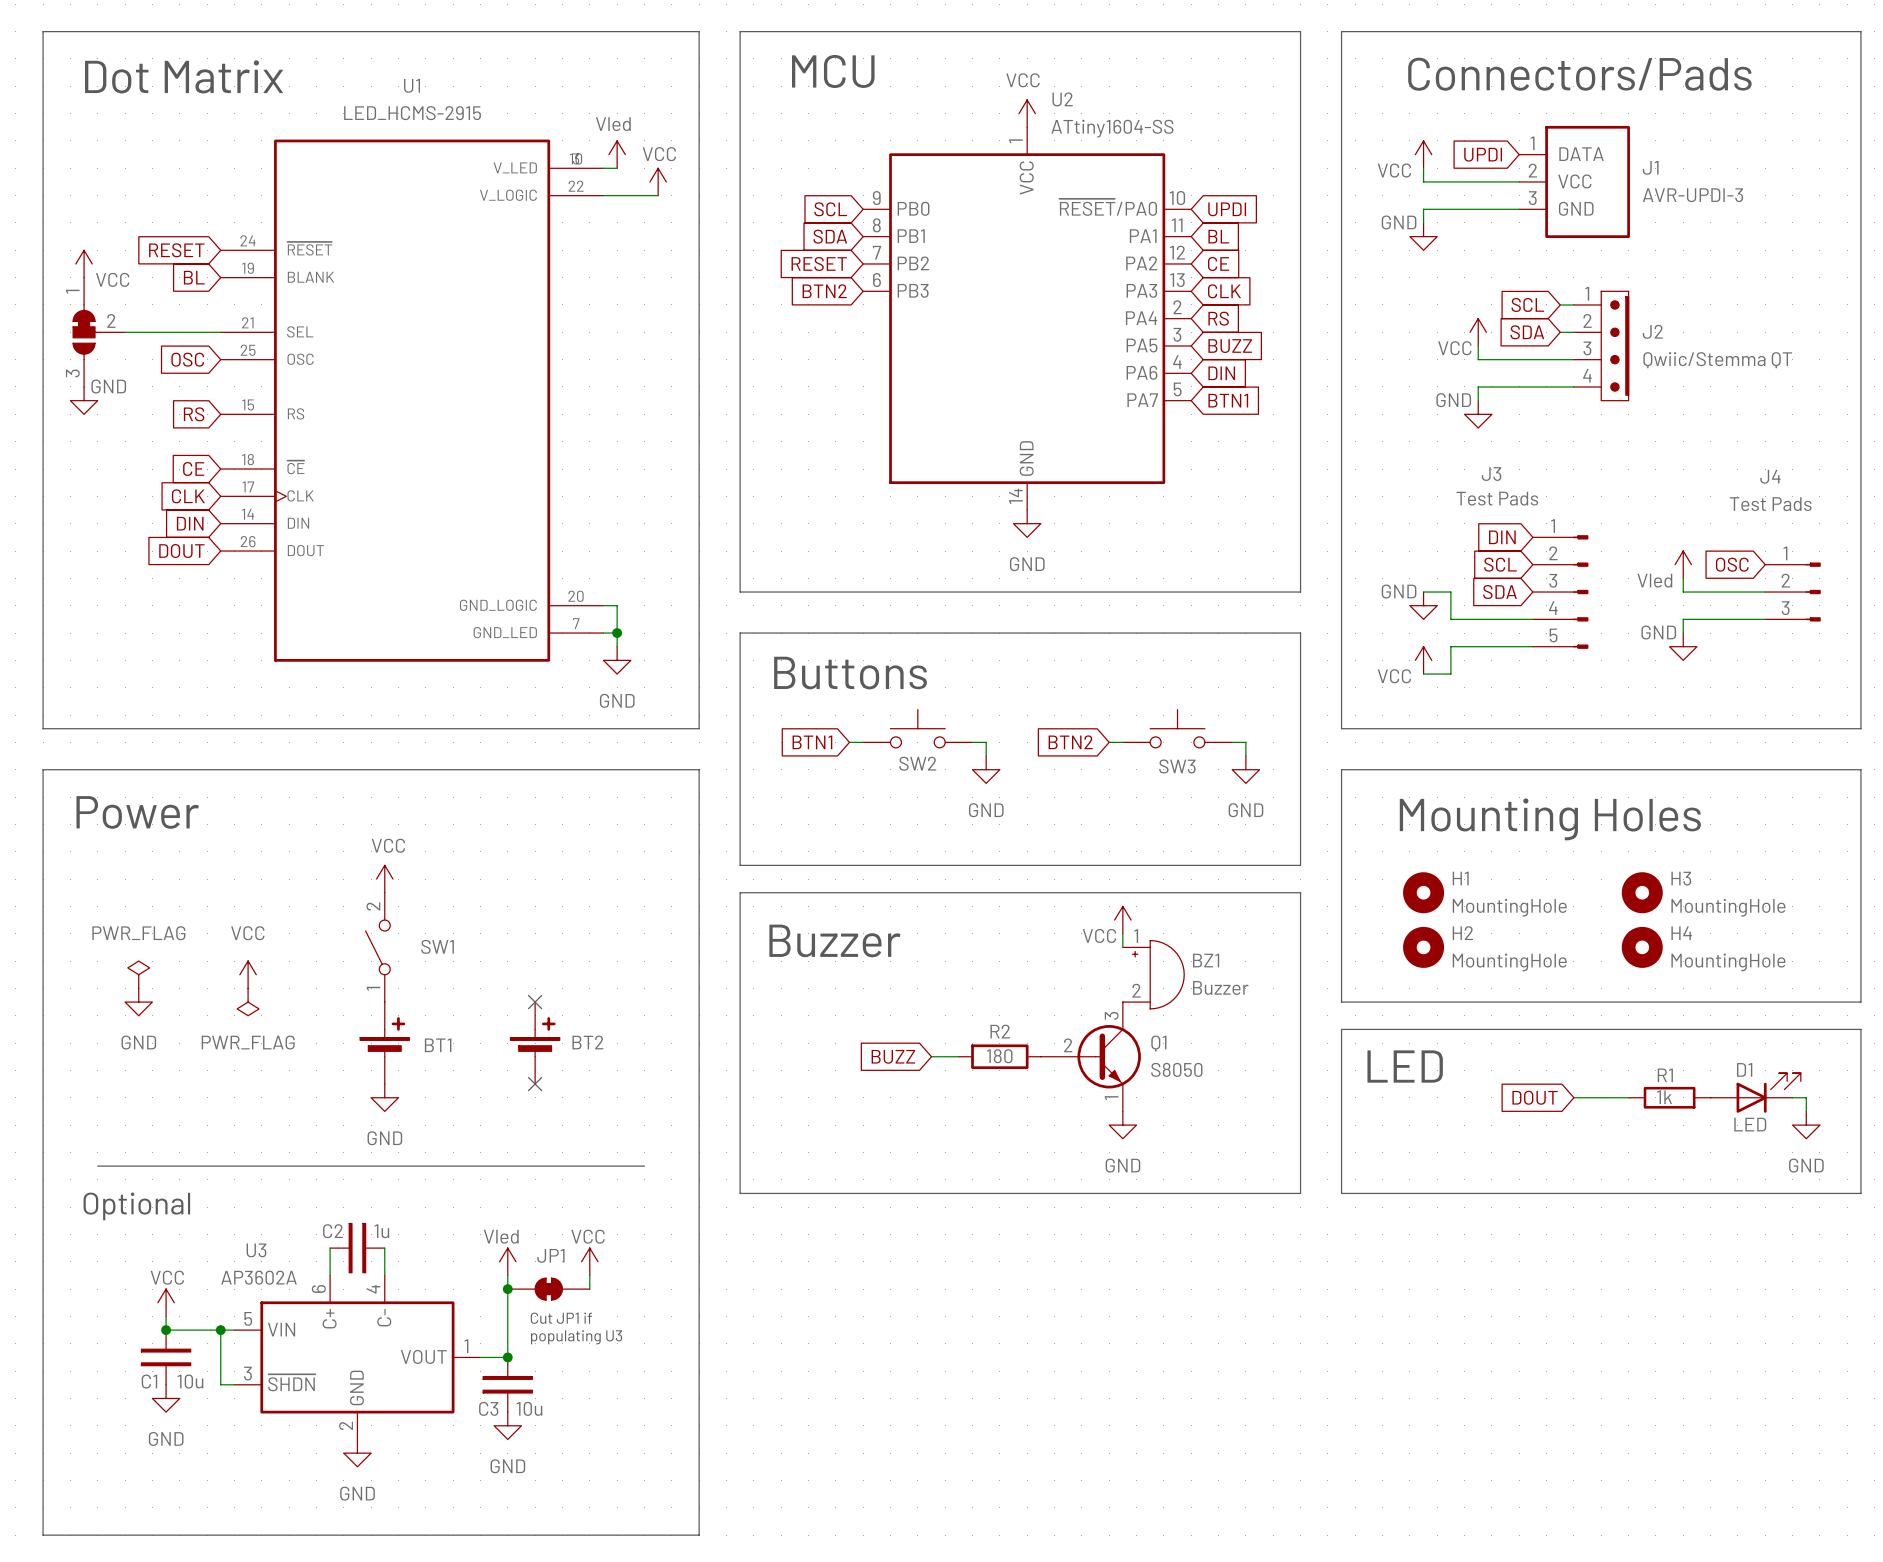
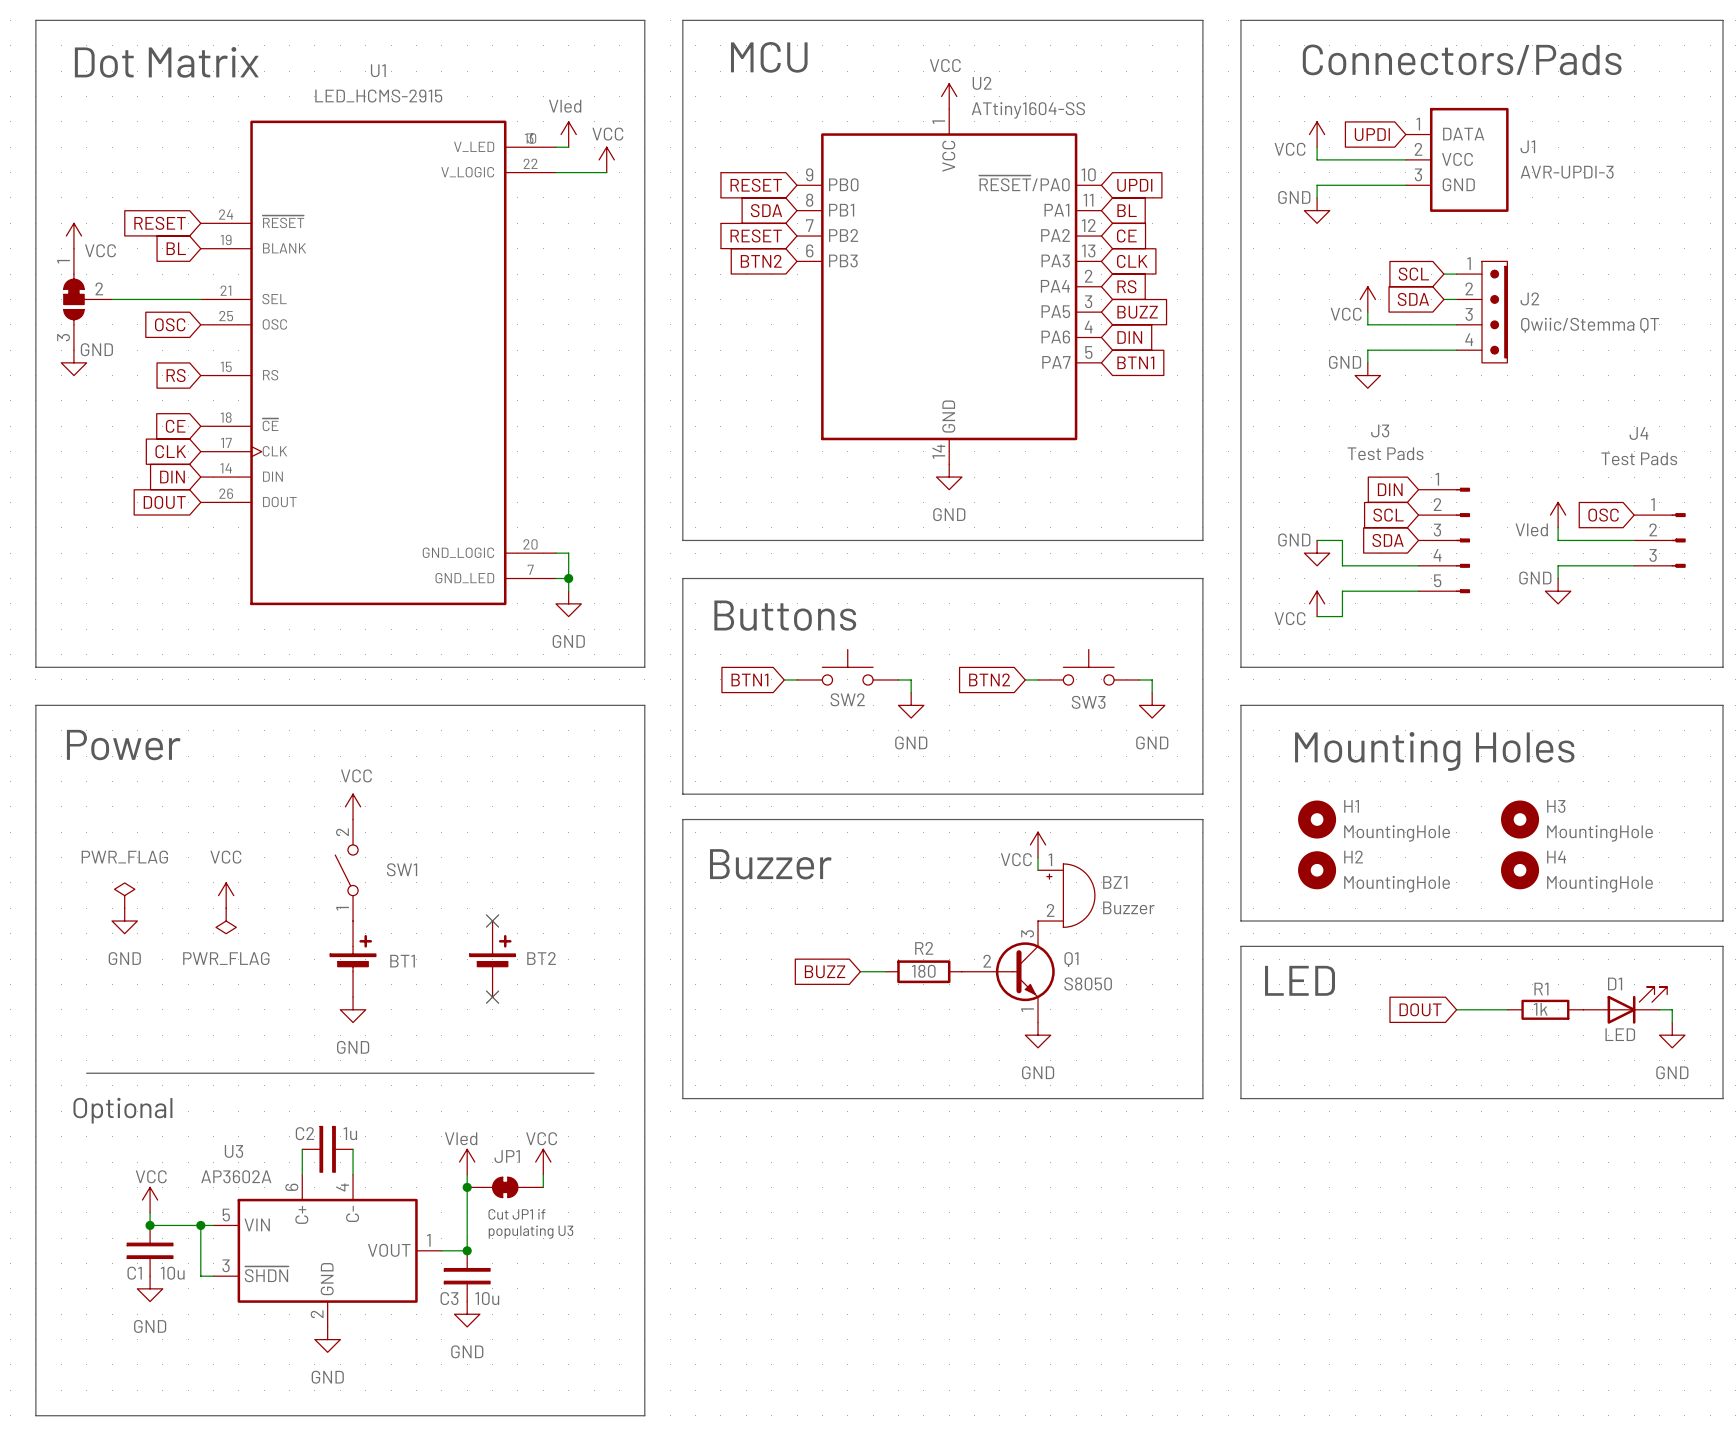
global label: SCL (830, 209) -> RESET (756, 185)

